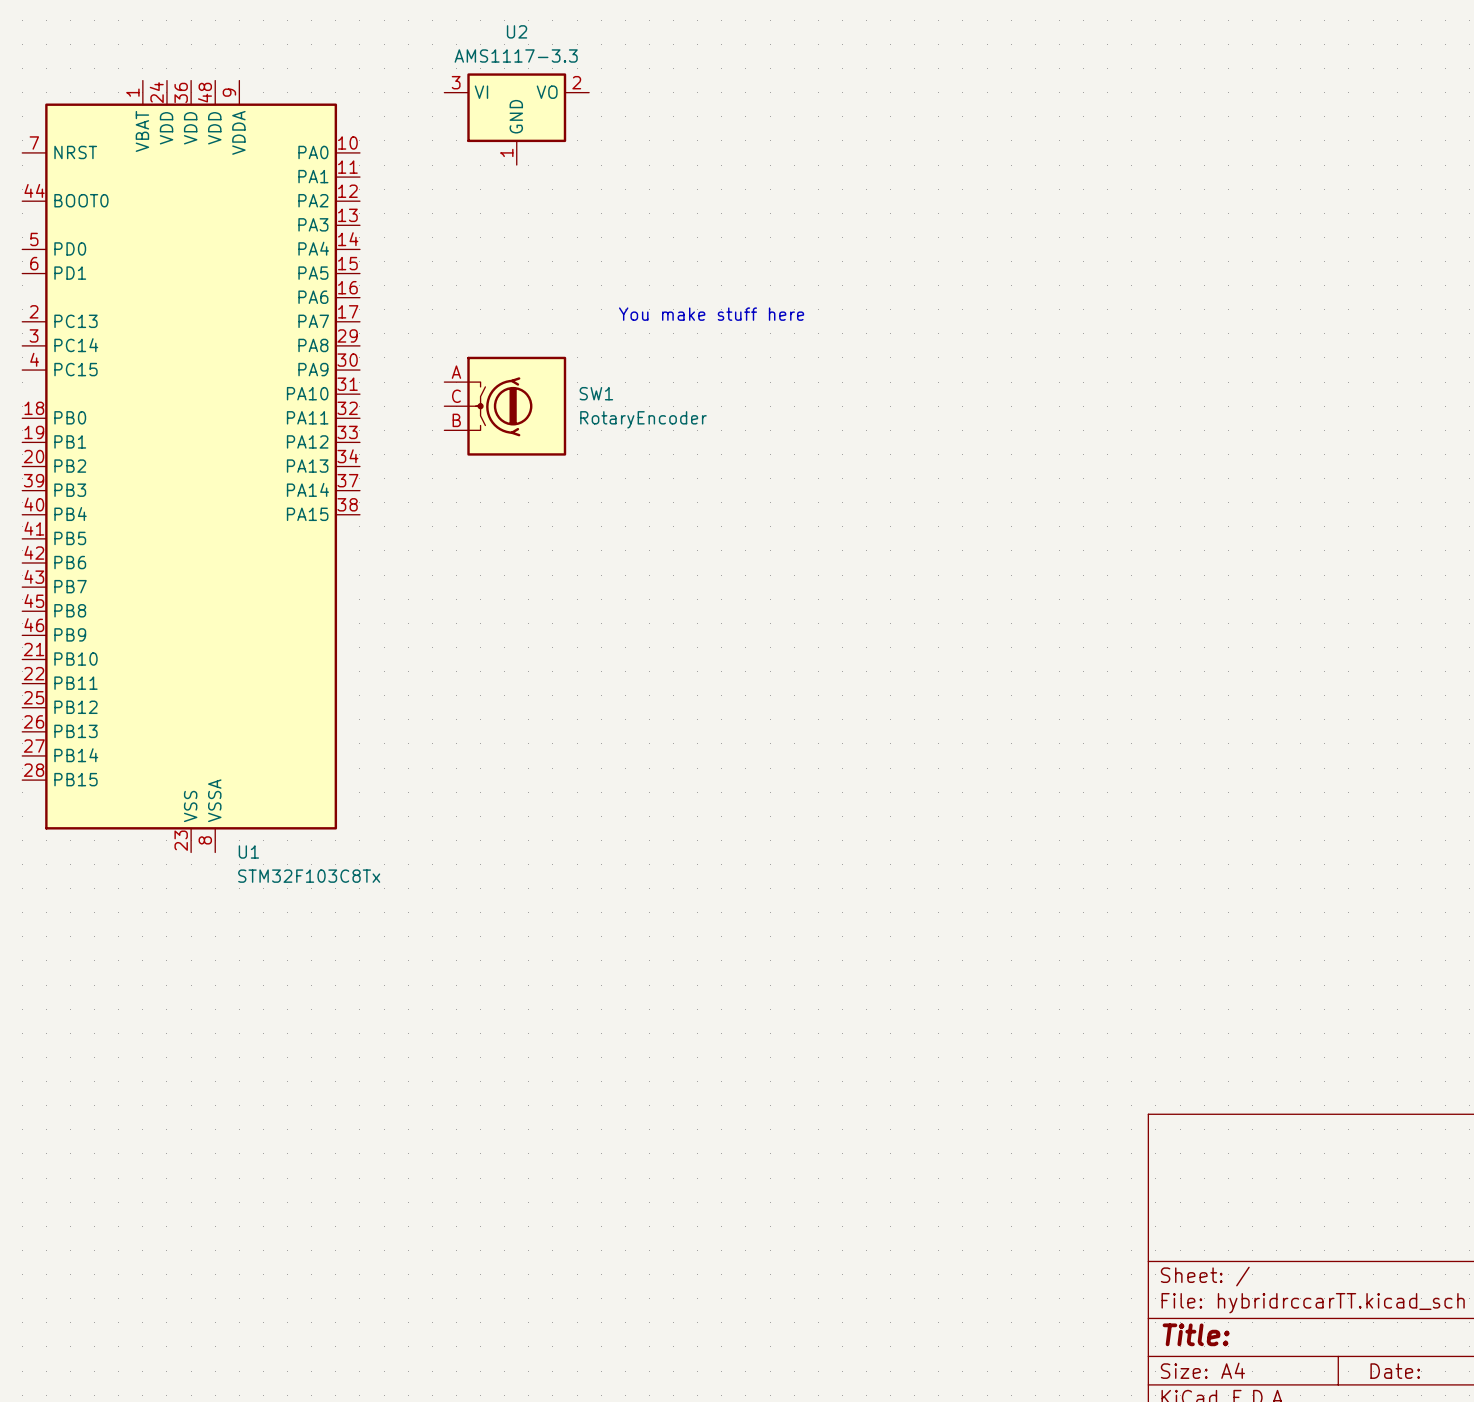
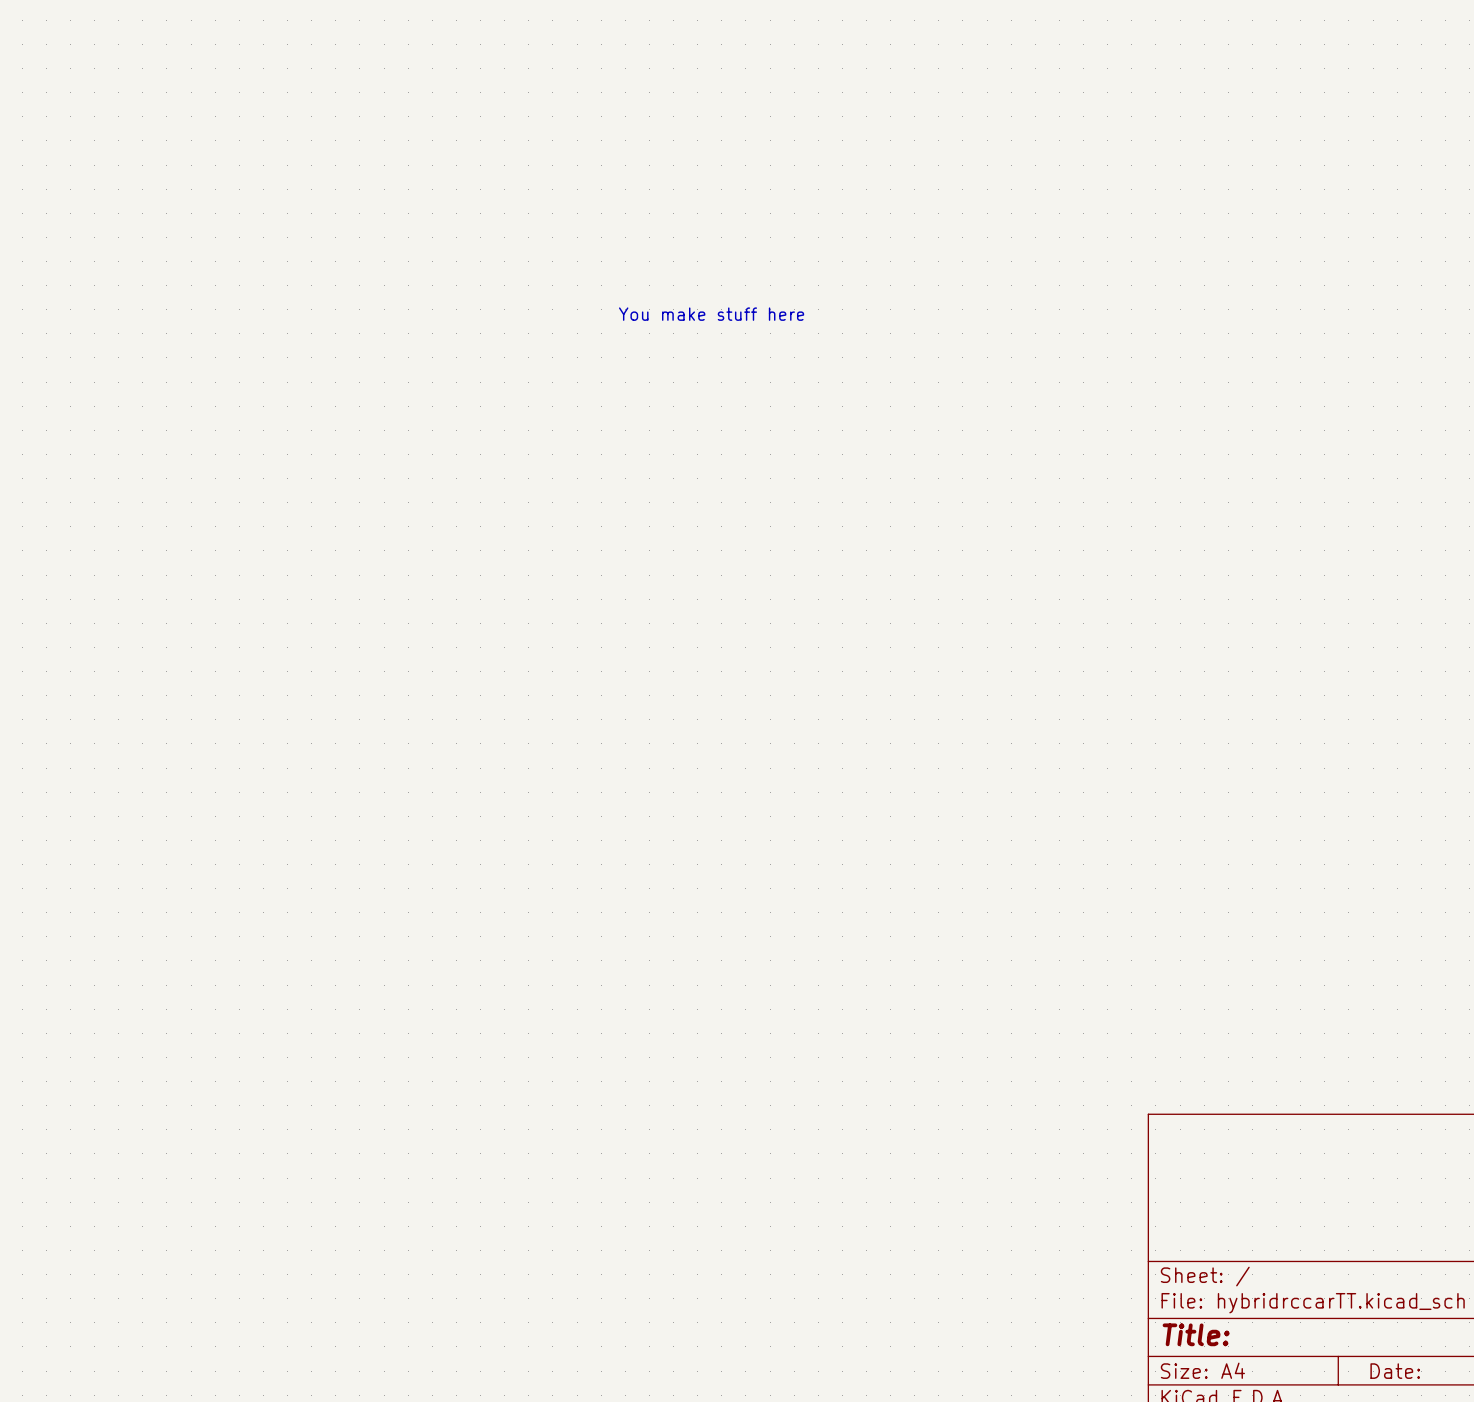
U2: AMS1117-3.3 (516, 119) -> none
SW1: RotaryEncoder (505, 406) -> none
U1: STM32F103C8Tx (191, 466) -> none

